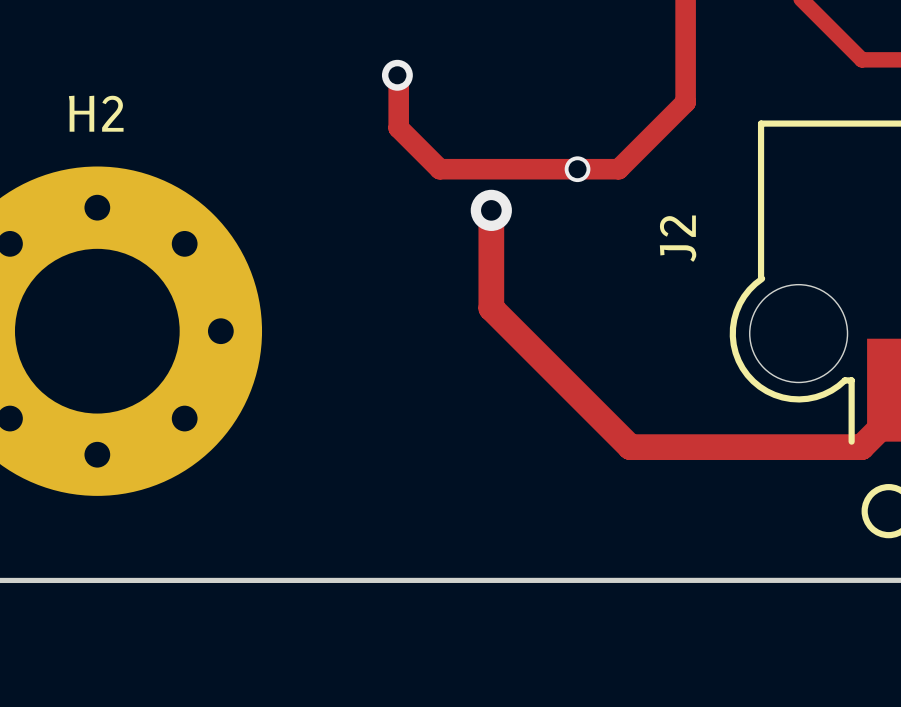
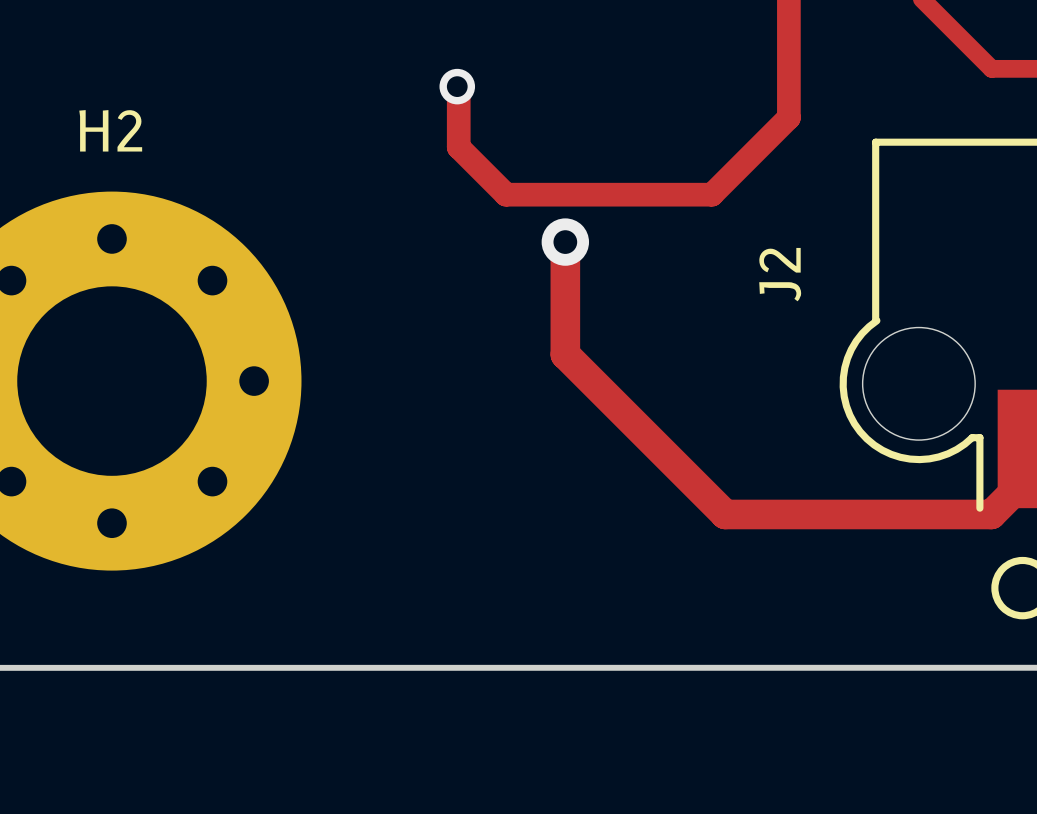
via: (577, 169) -> none

